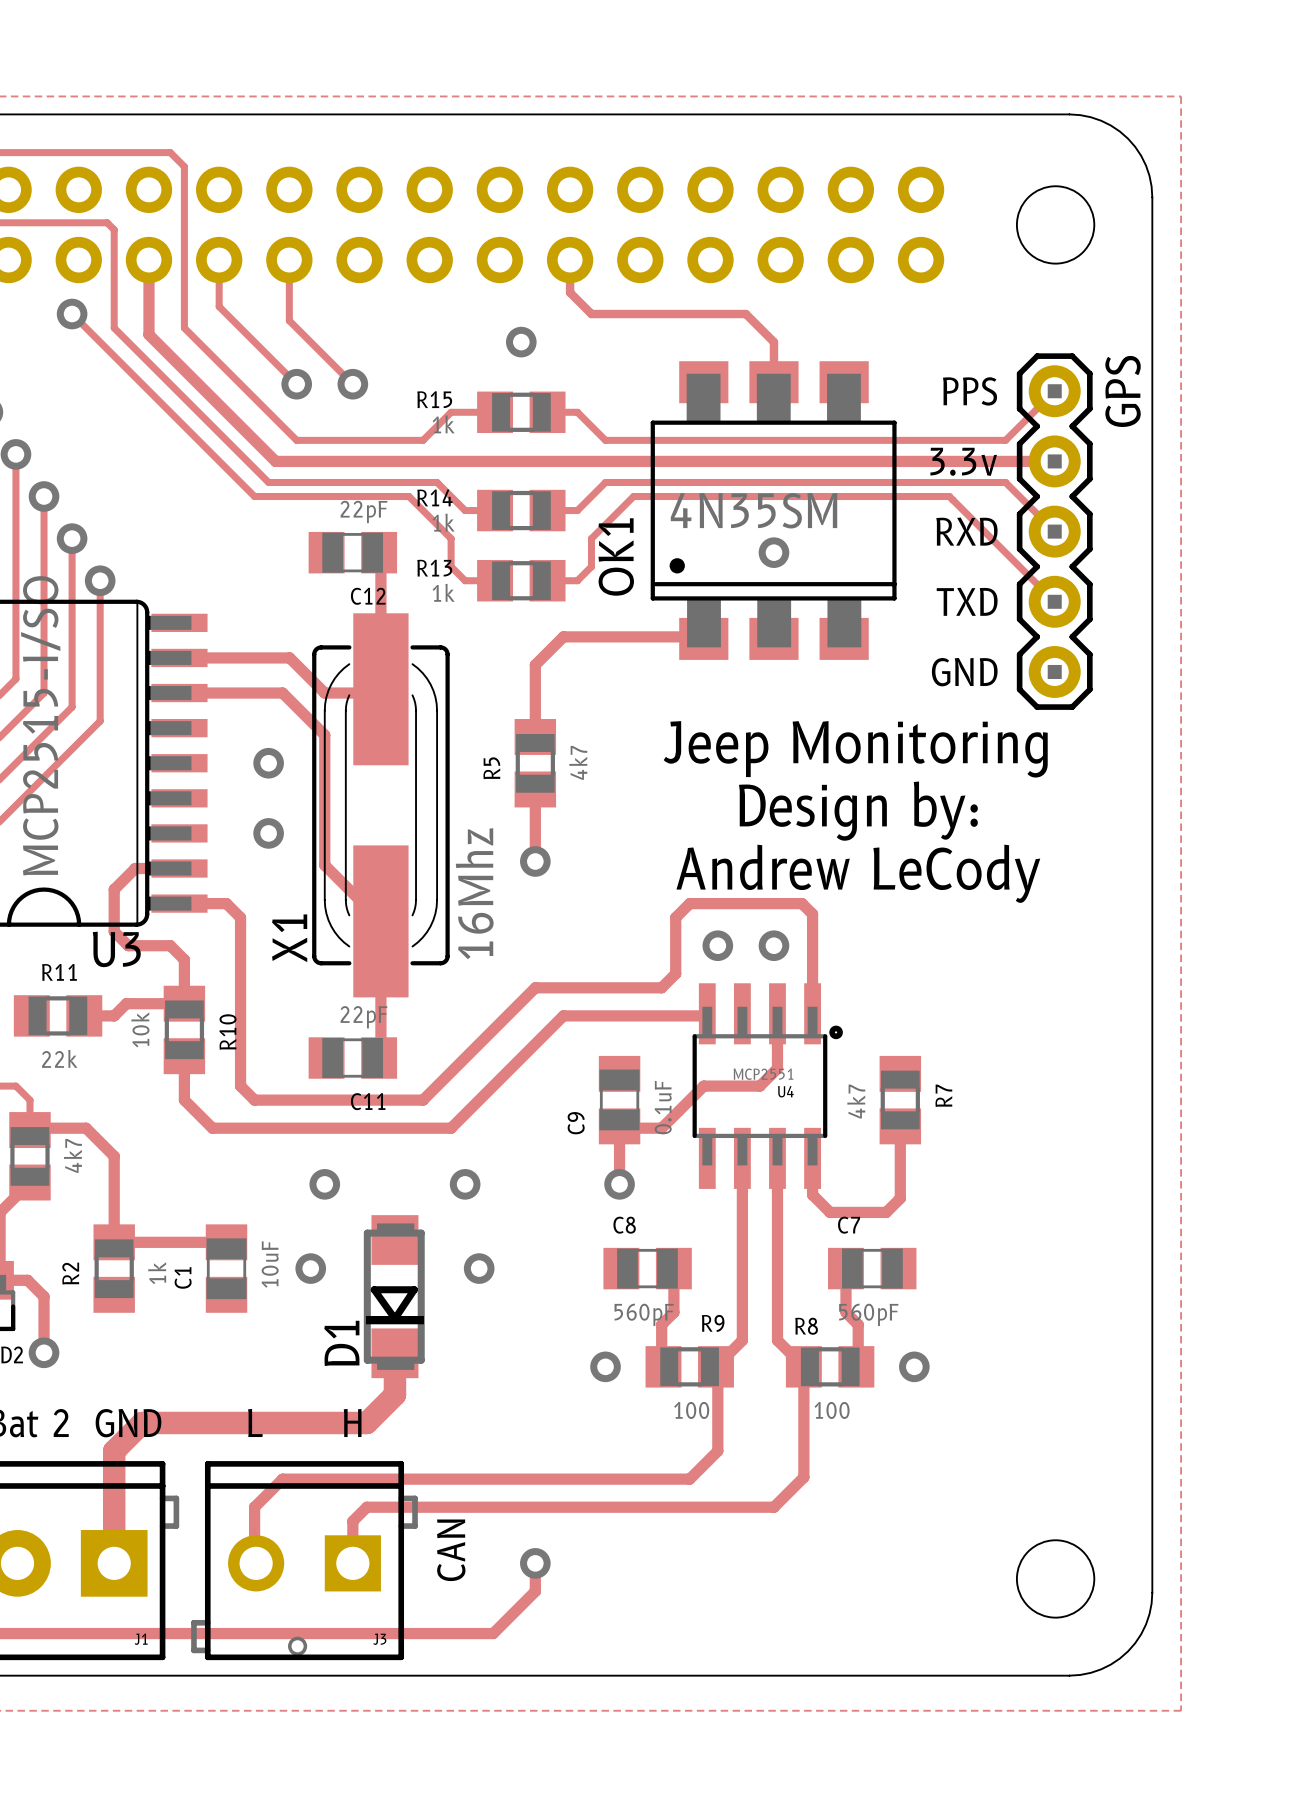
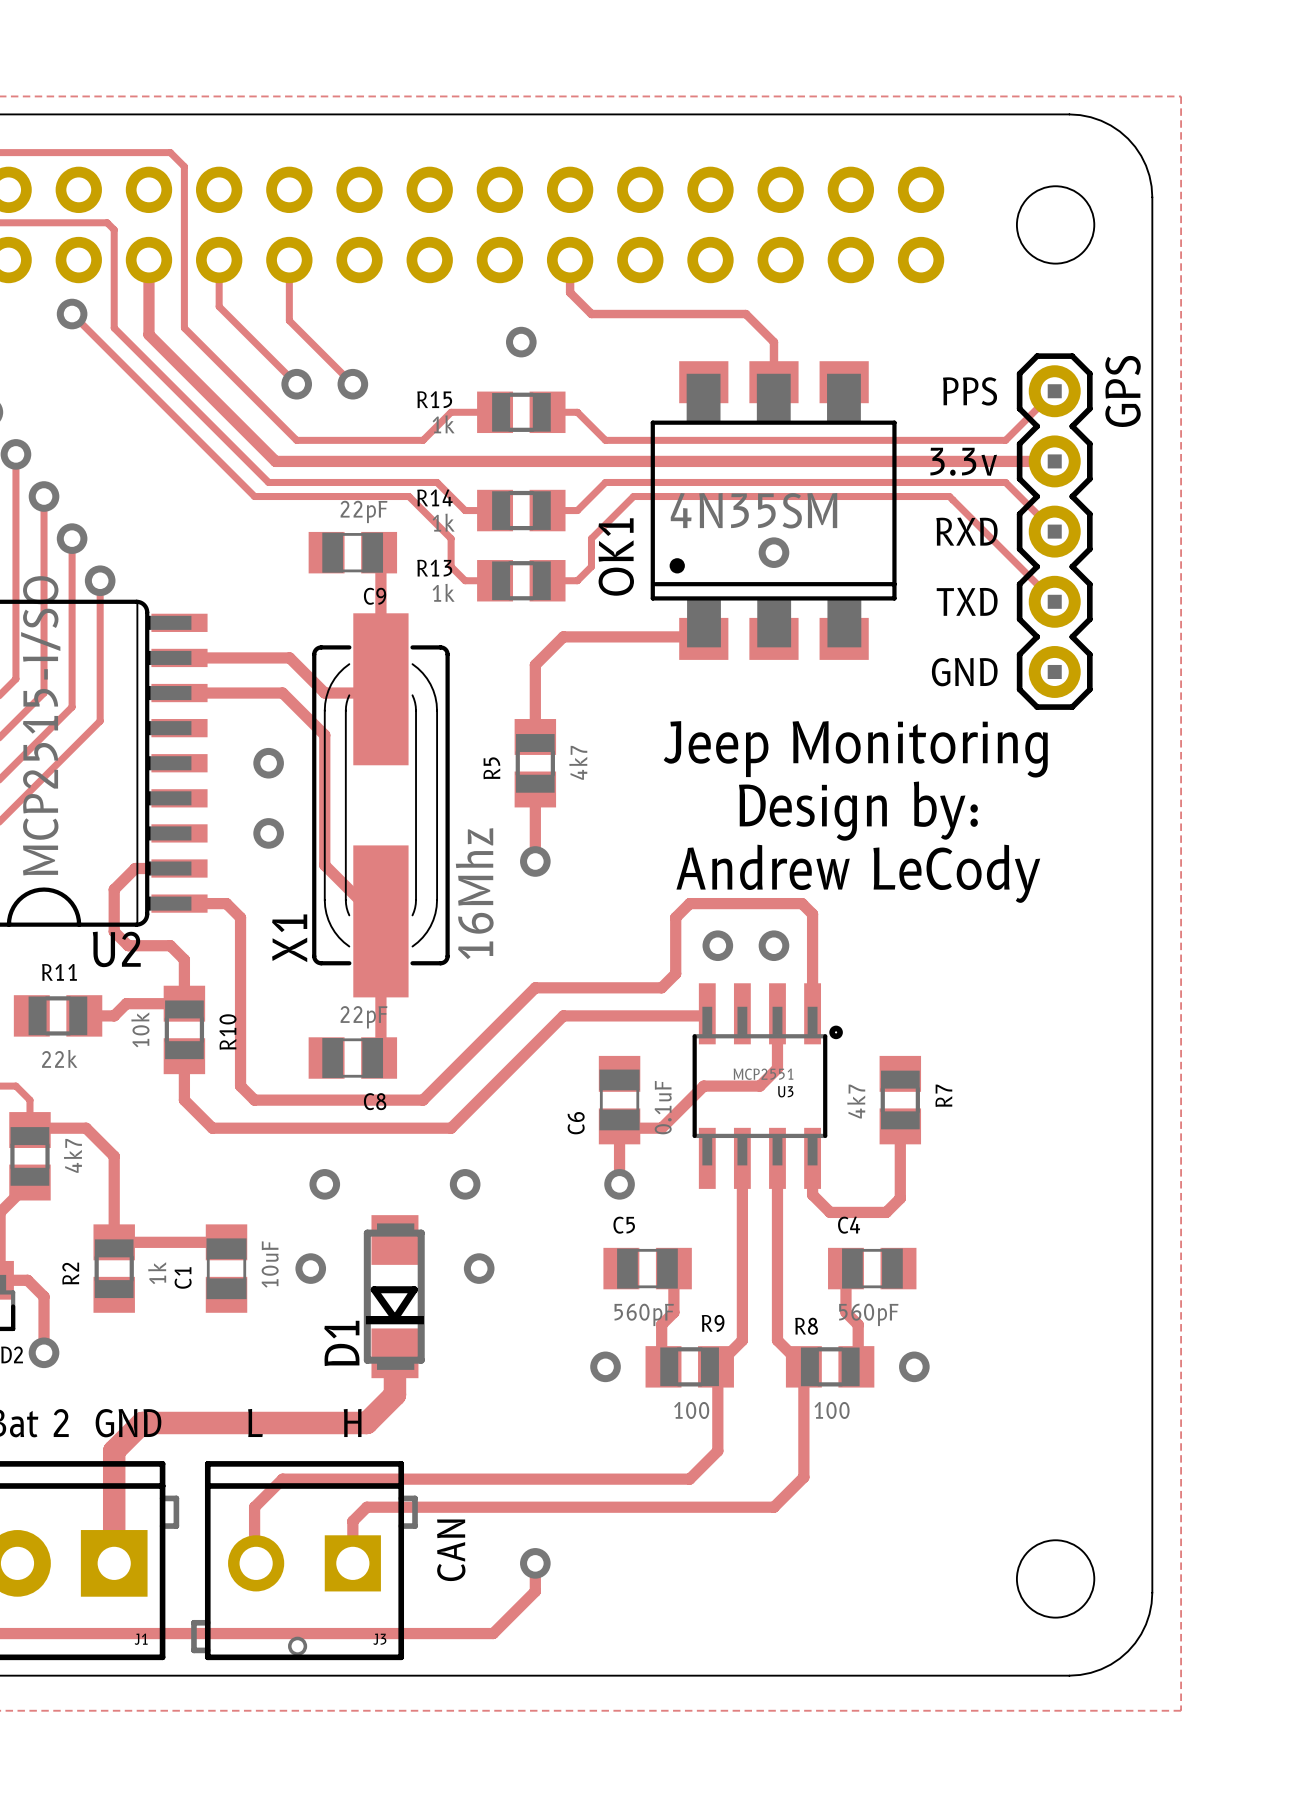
C12 name: C12 (368, 596) -> C9 (375, 596)
U3 name: U3 (116, 949) -> U2 (116, 949)
U4 name: U4 (785, 1091) -> U3 (785, 1091)
C11 name: C11 (368, 1101) -> C8 (375, 1101)
C9 name: C9 (576, 1123) -> C6 (576, 1123)
C8 name: C8 (624, 1225) -> C5 (624, 1225)
C7 name: C7 (849, 1225) -> C4 (849, 1225)

